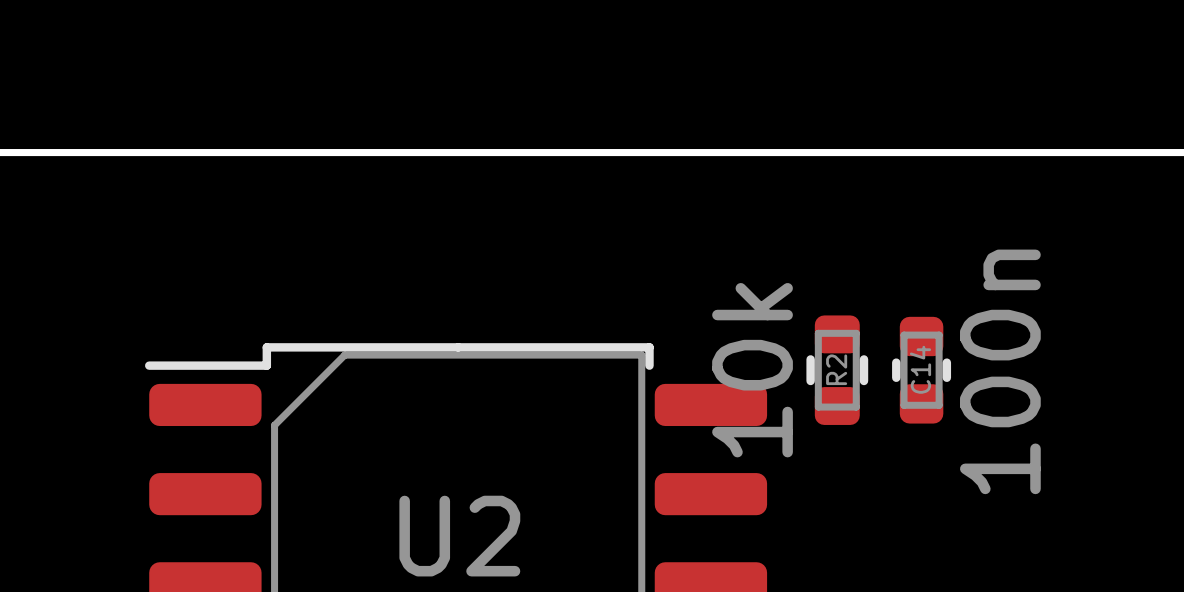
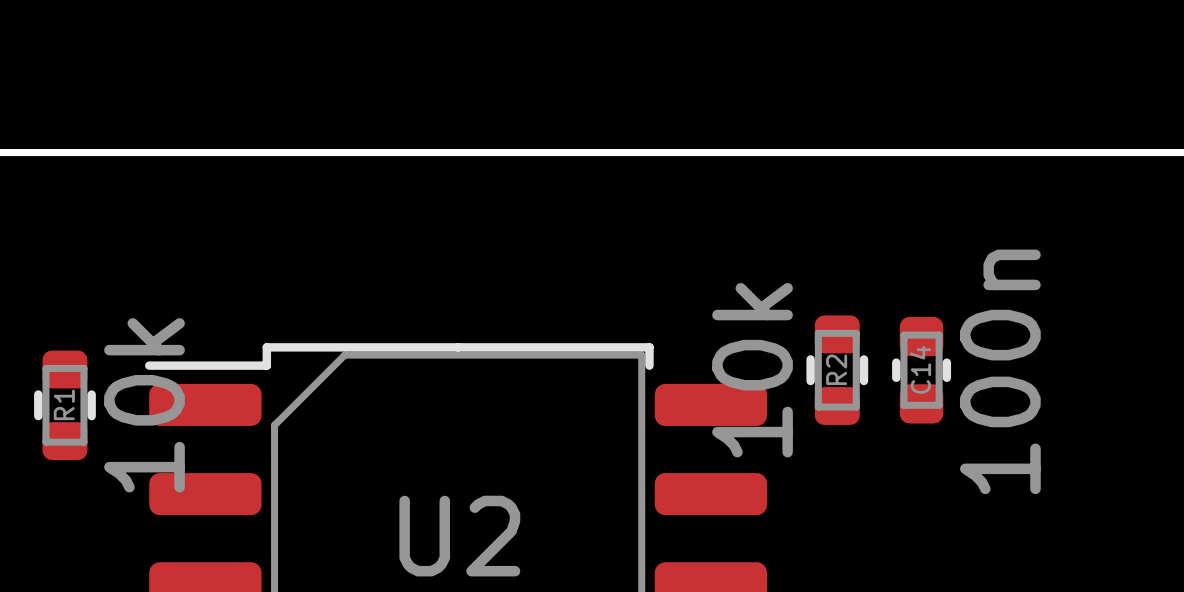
R1: none -> 10k (64, 405)

